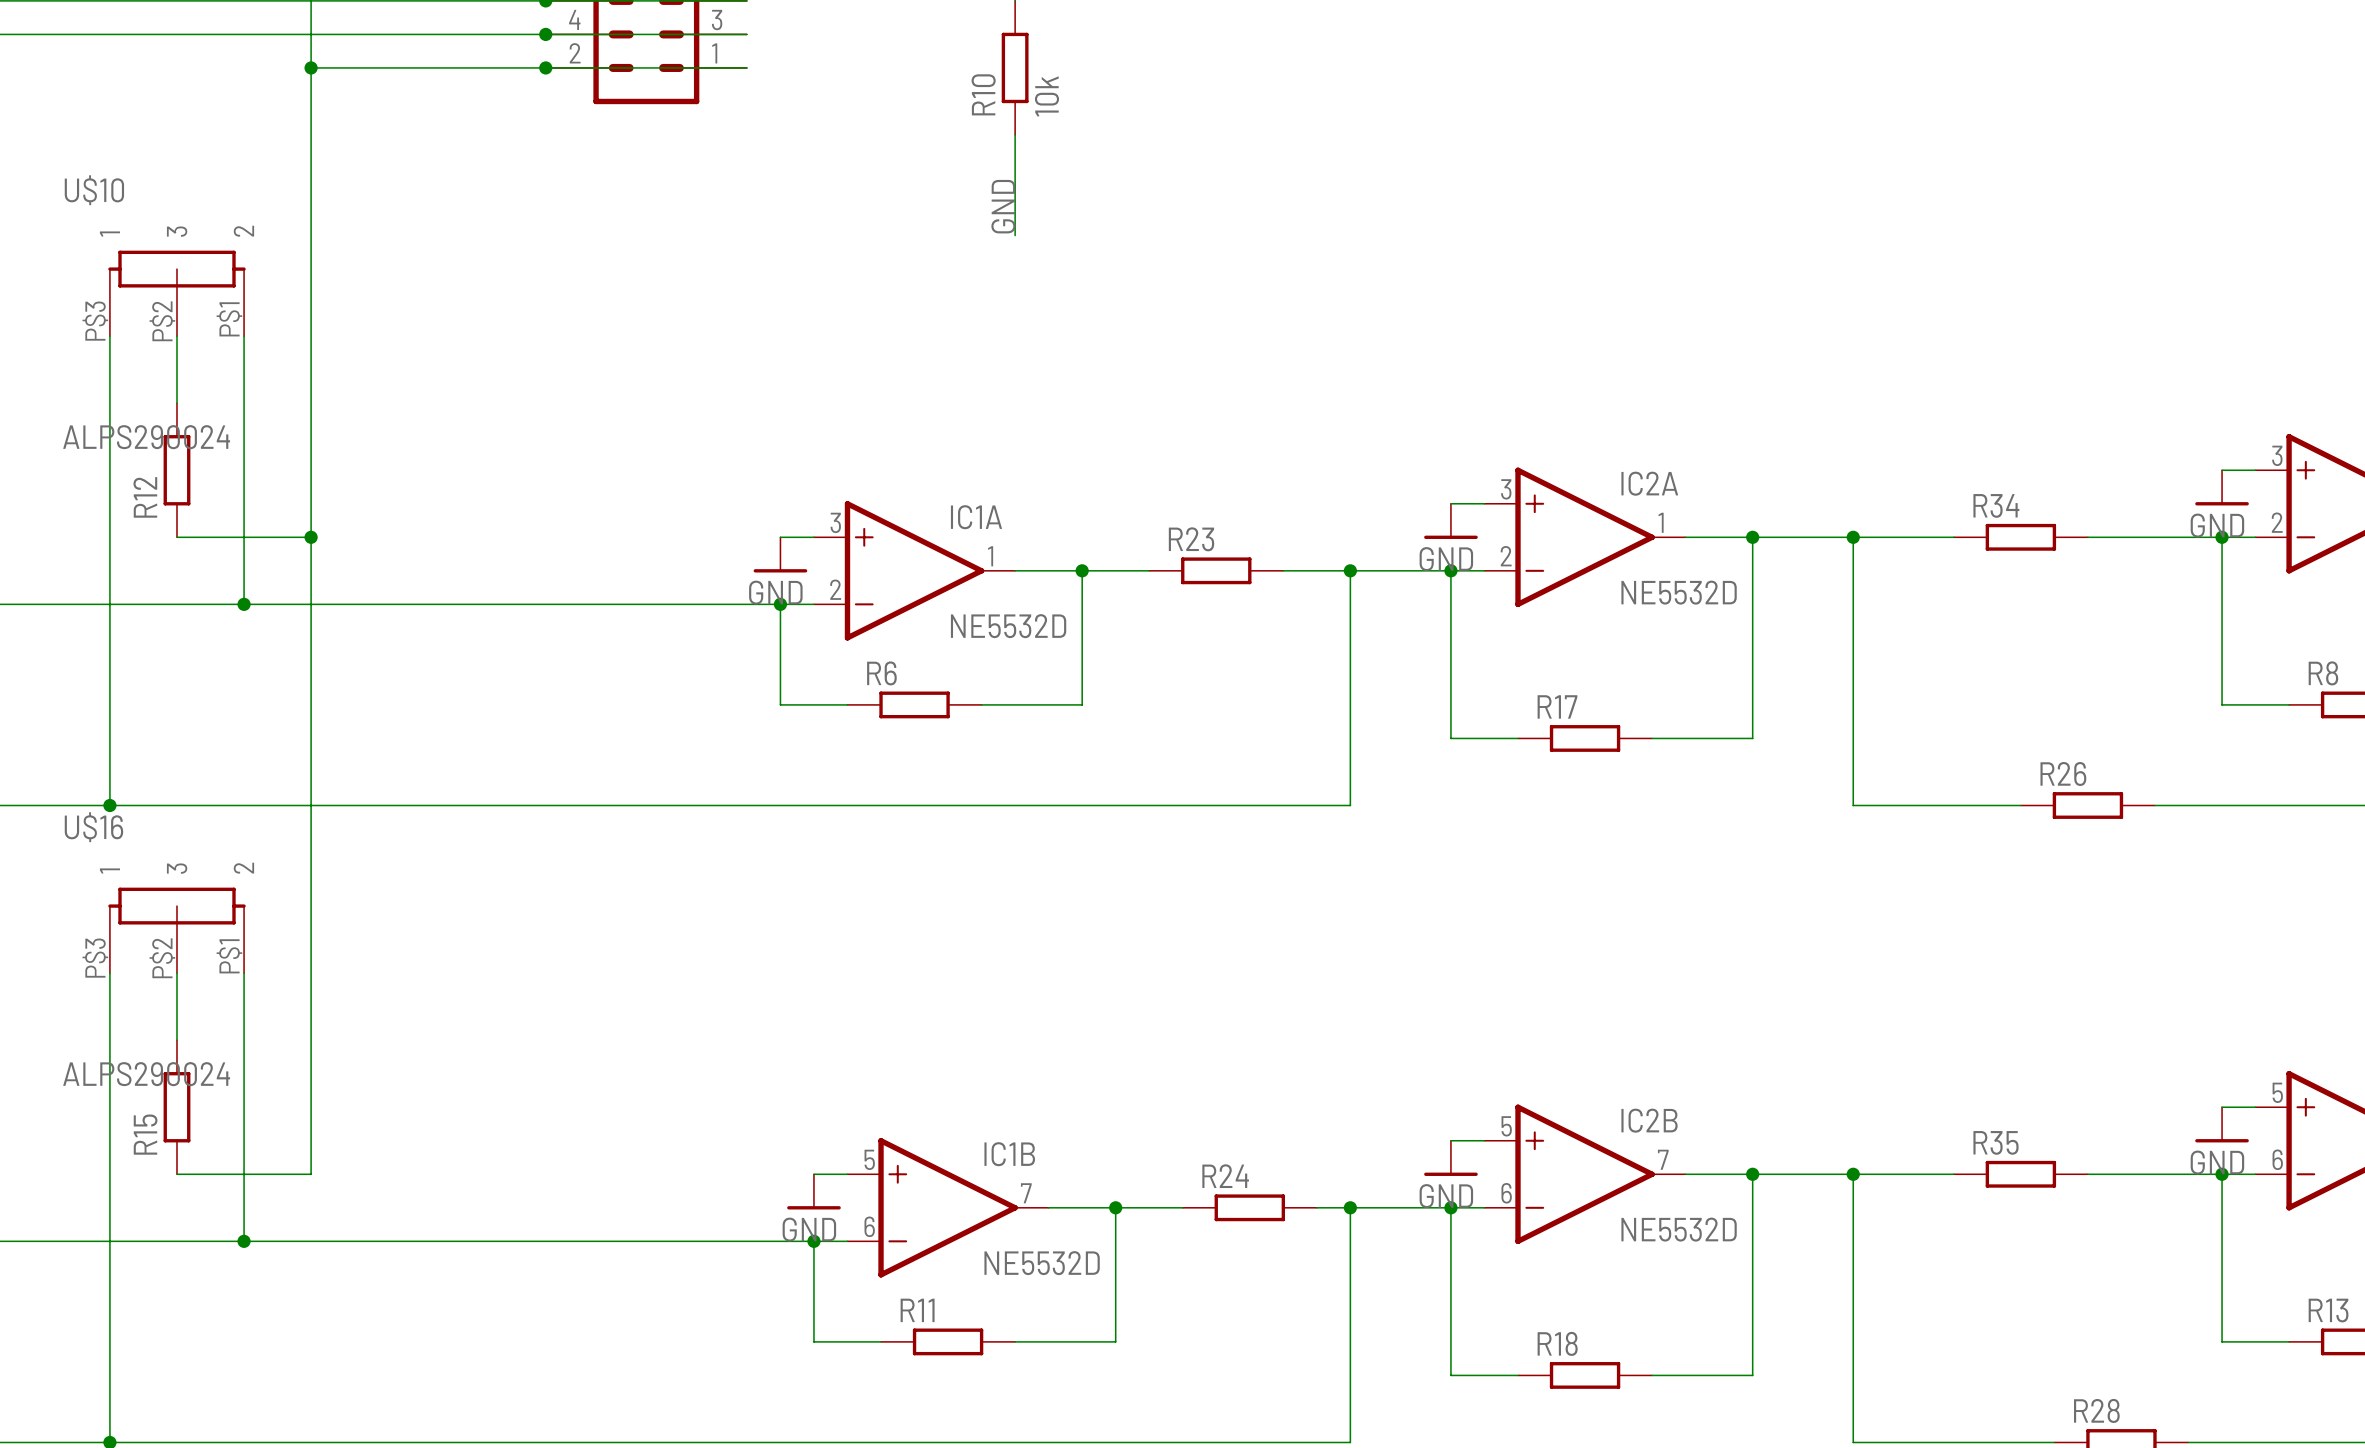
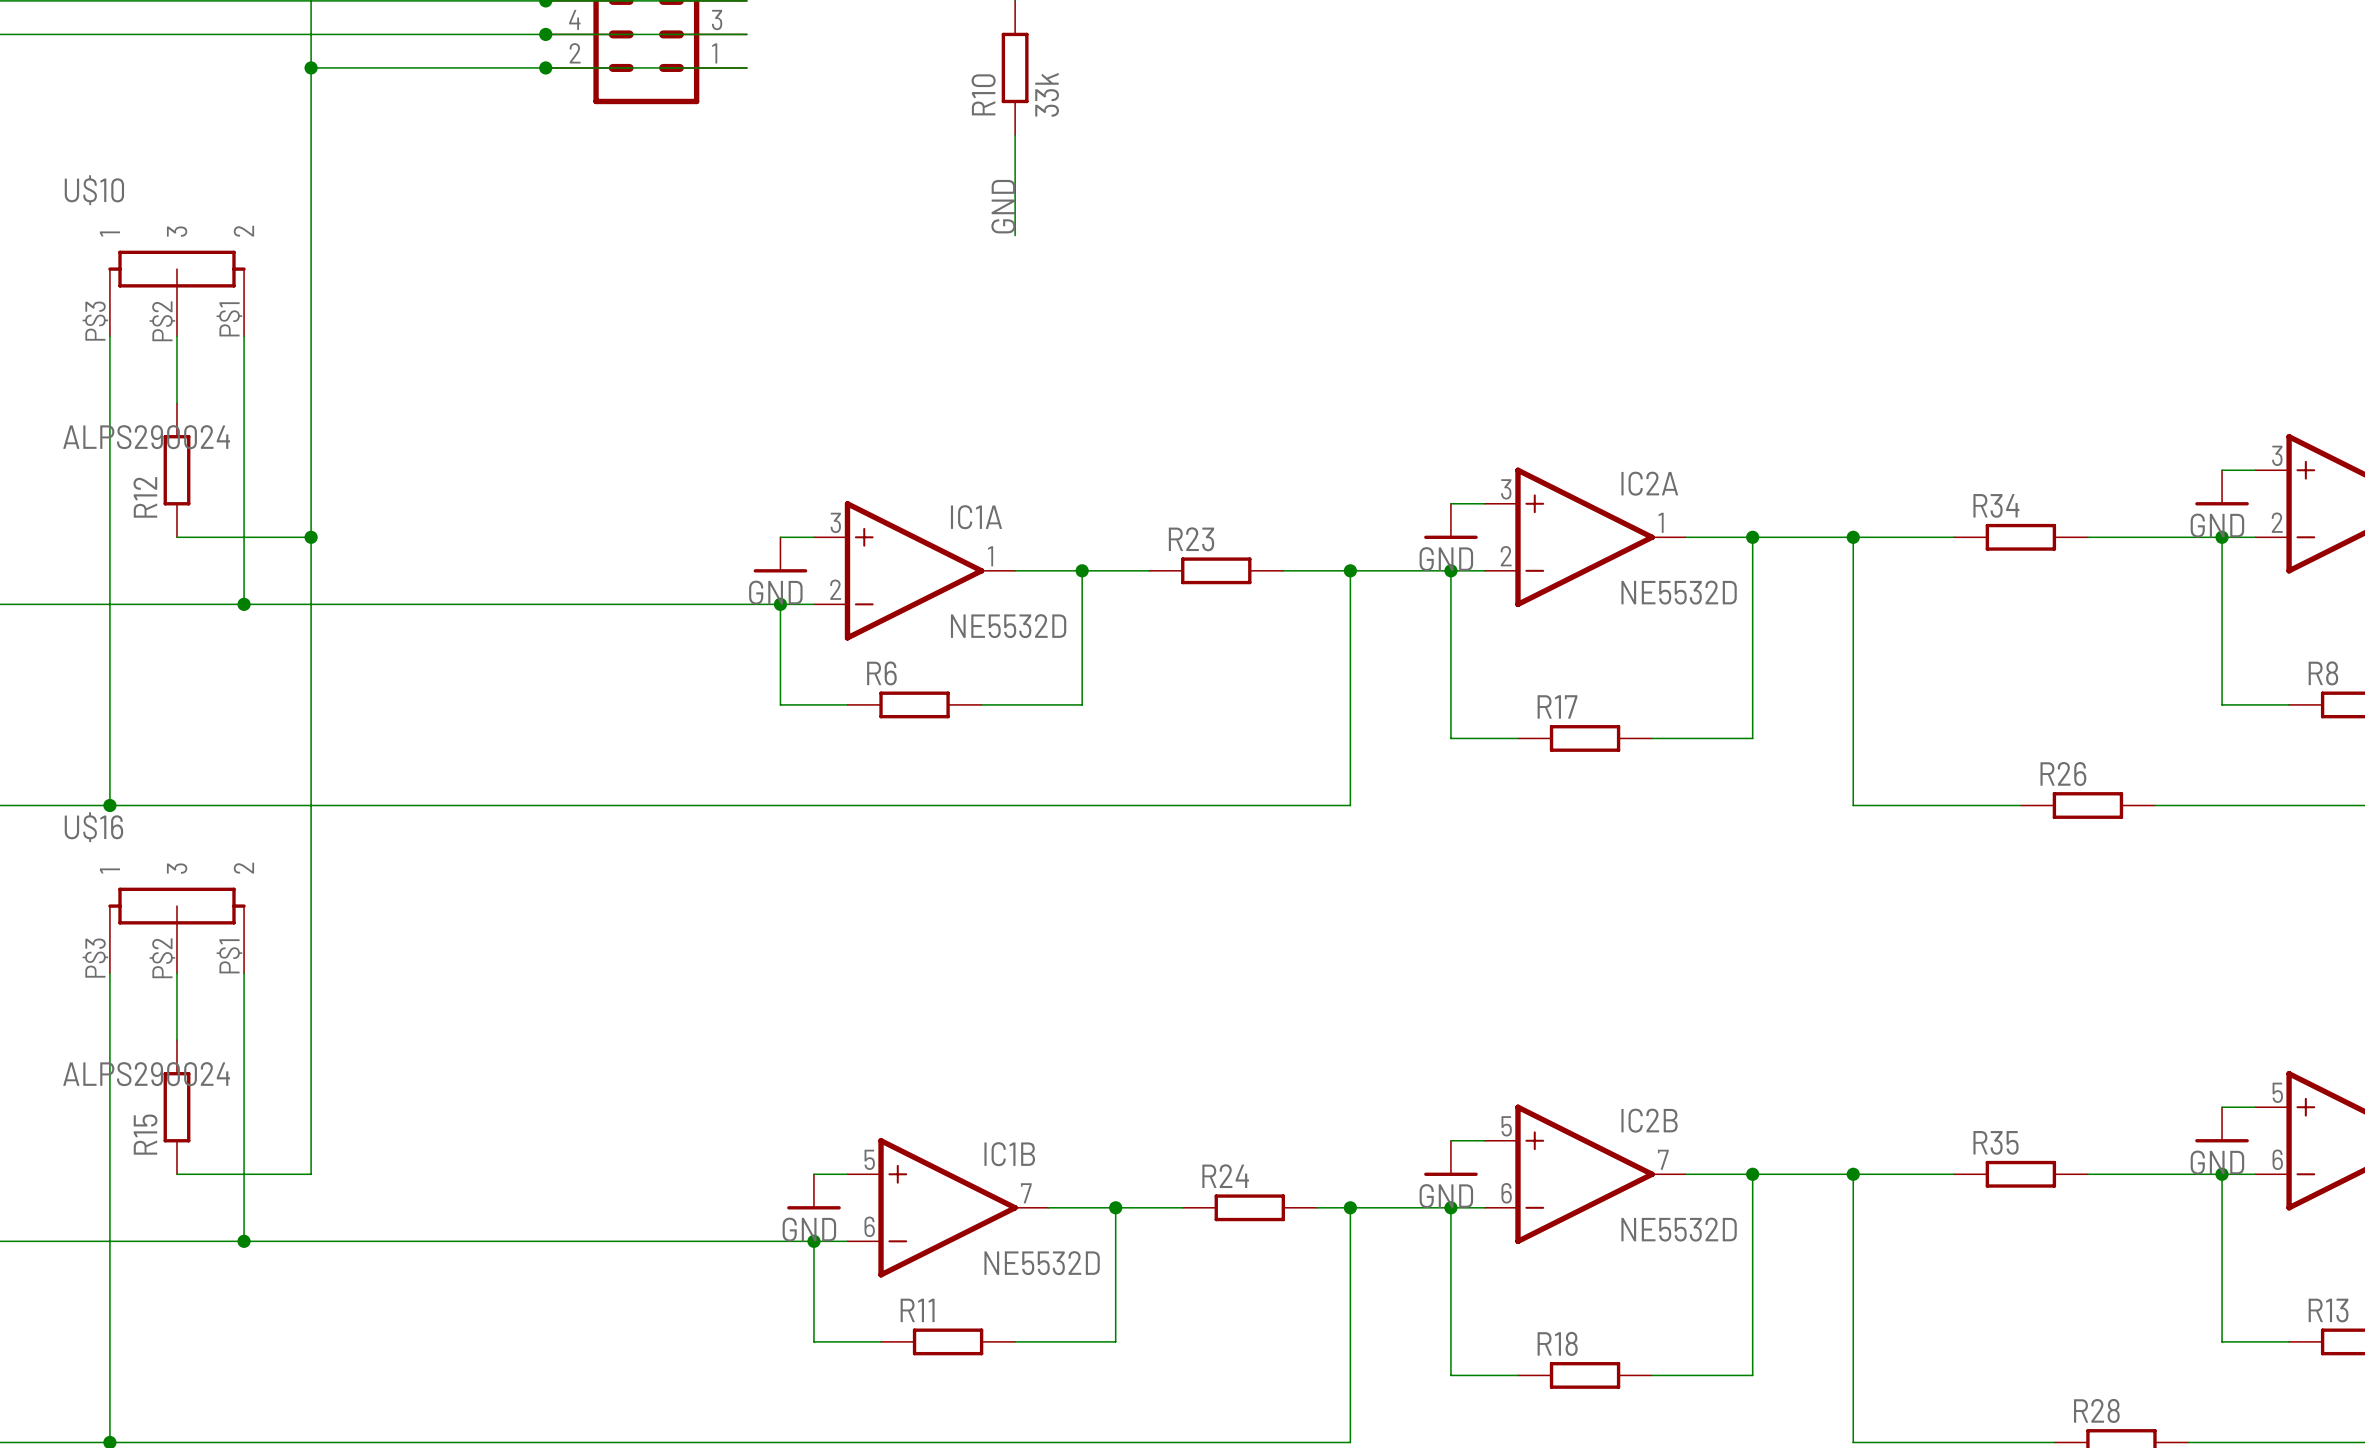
R10 value: 10k (1046, 96) -> 33k (1047, 94)

